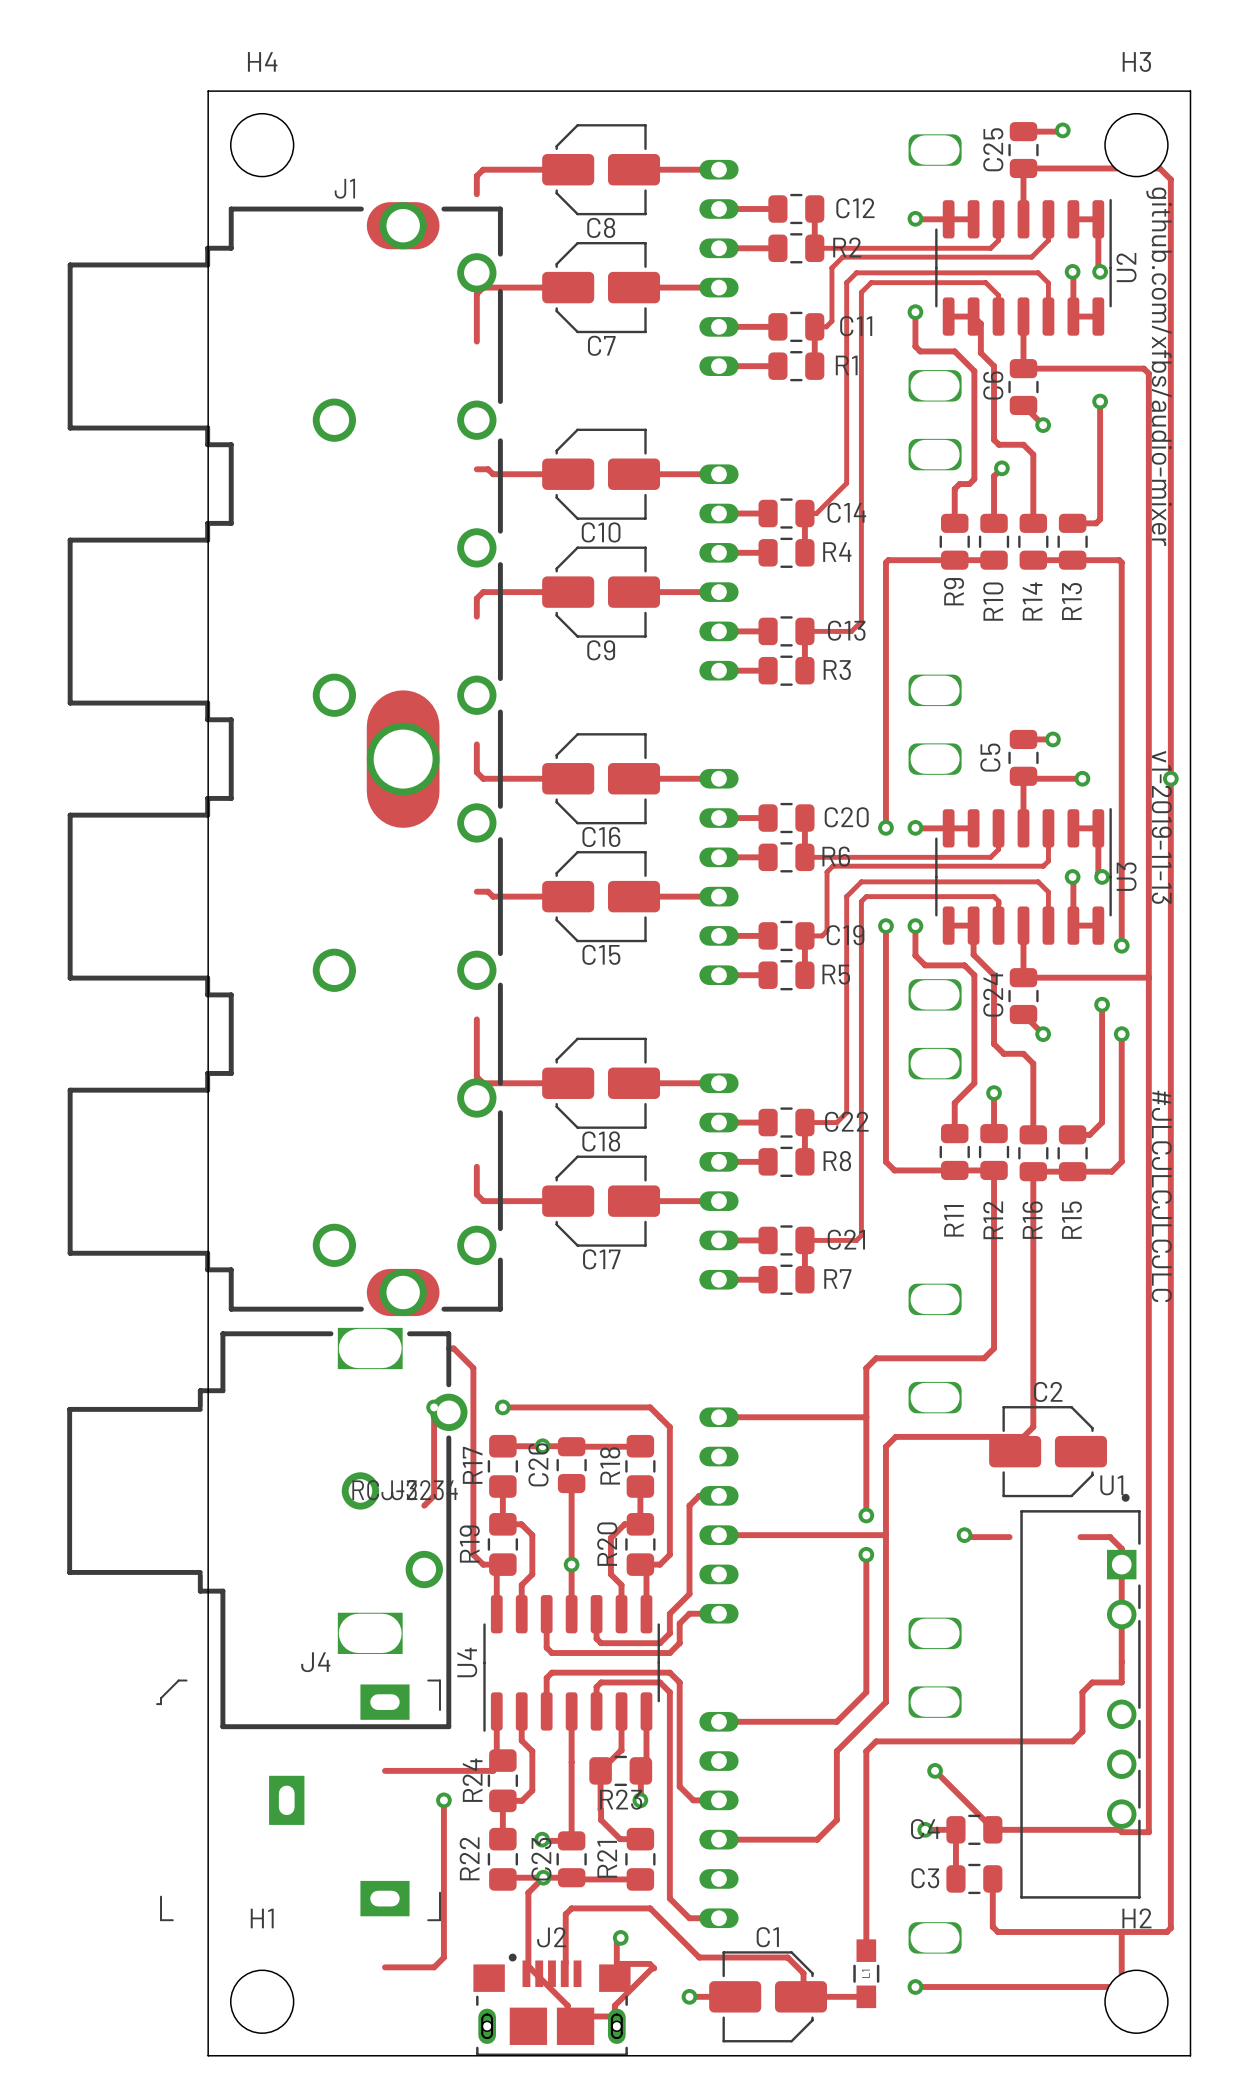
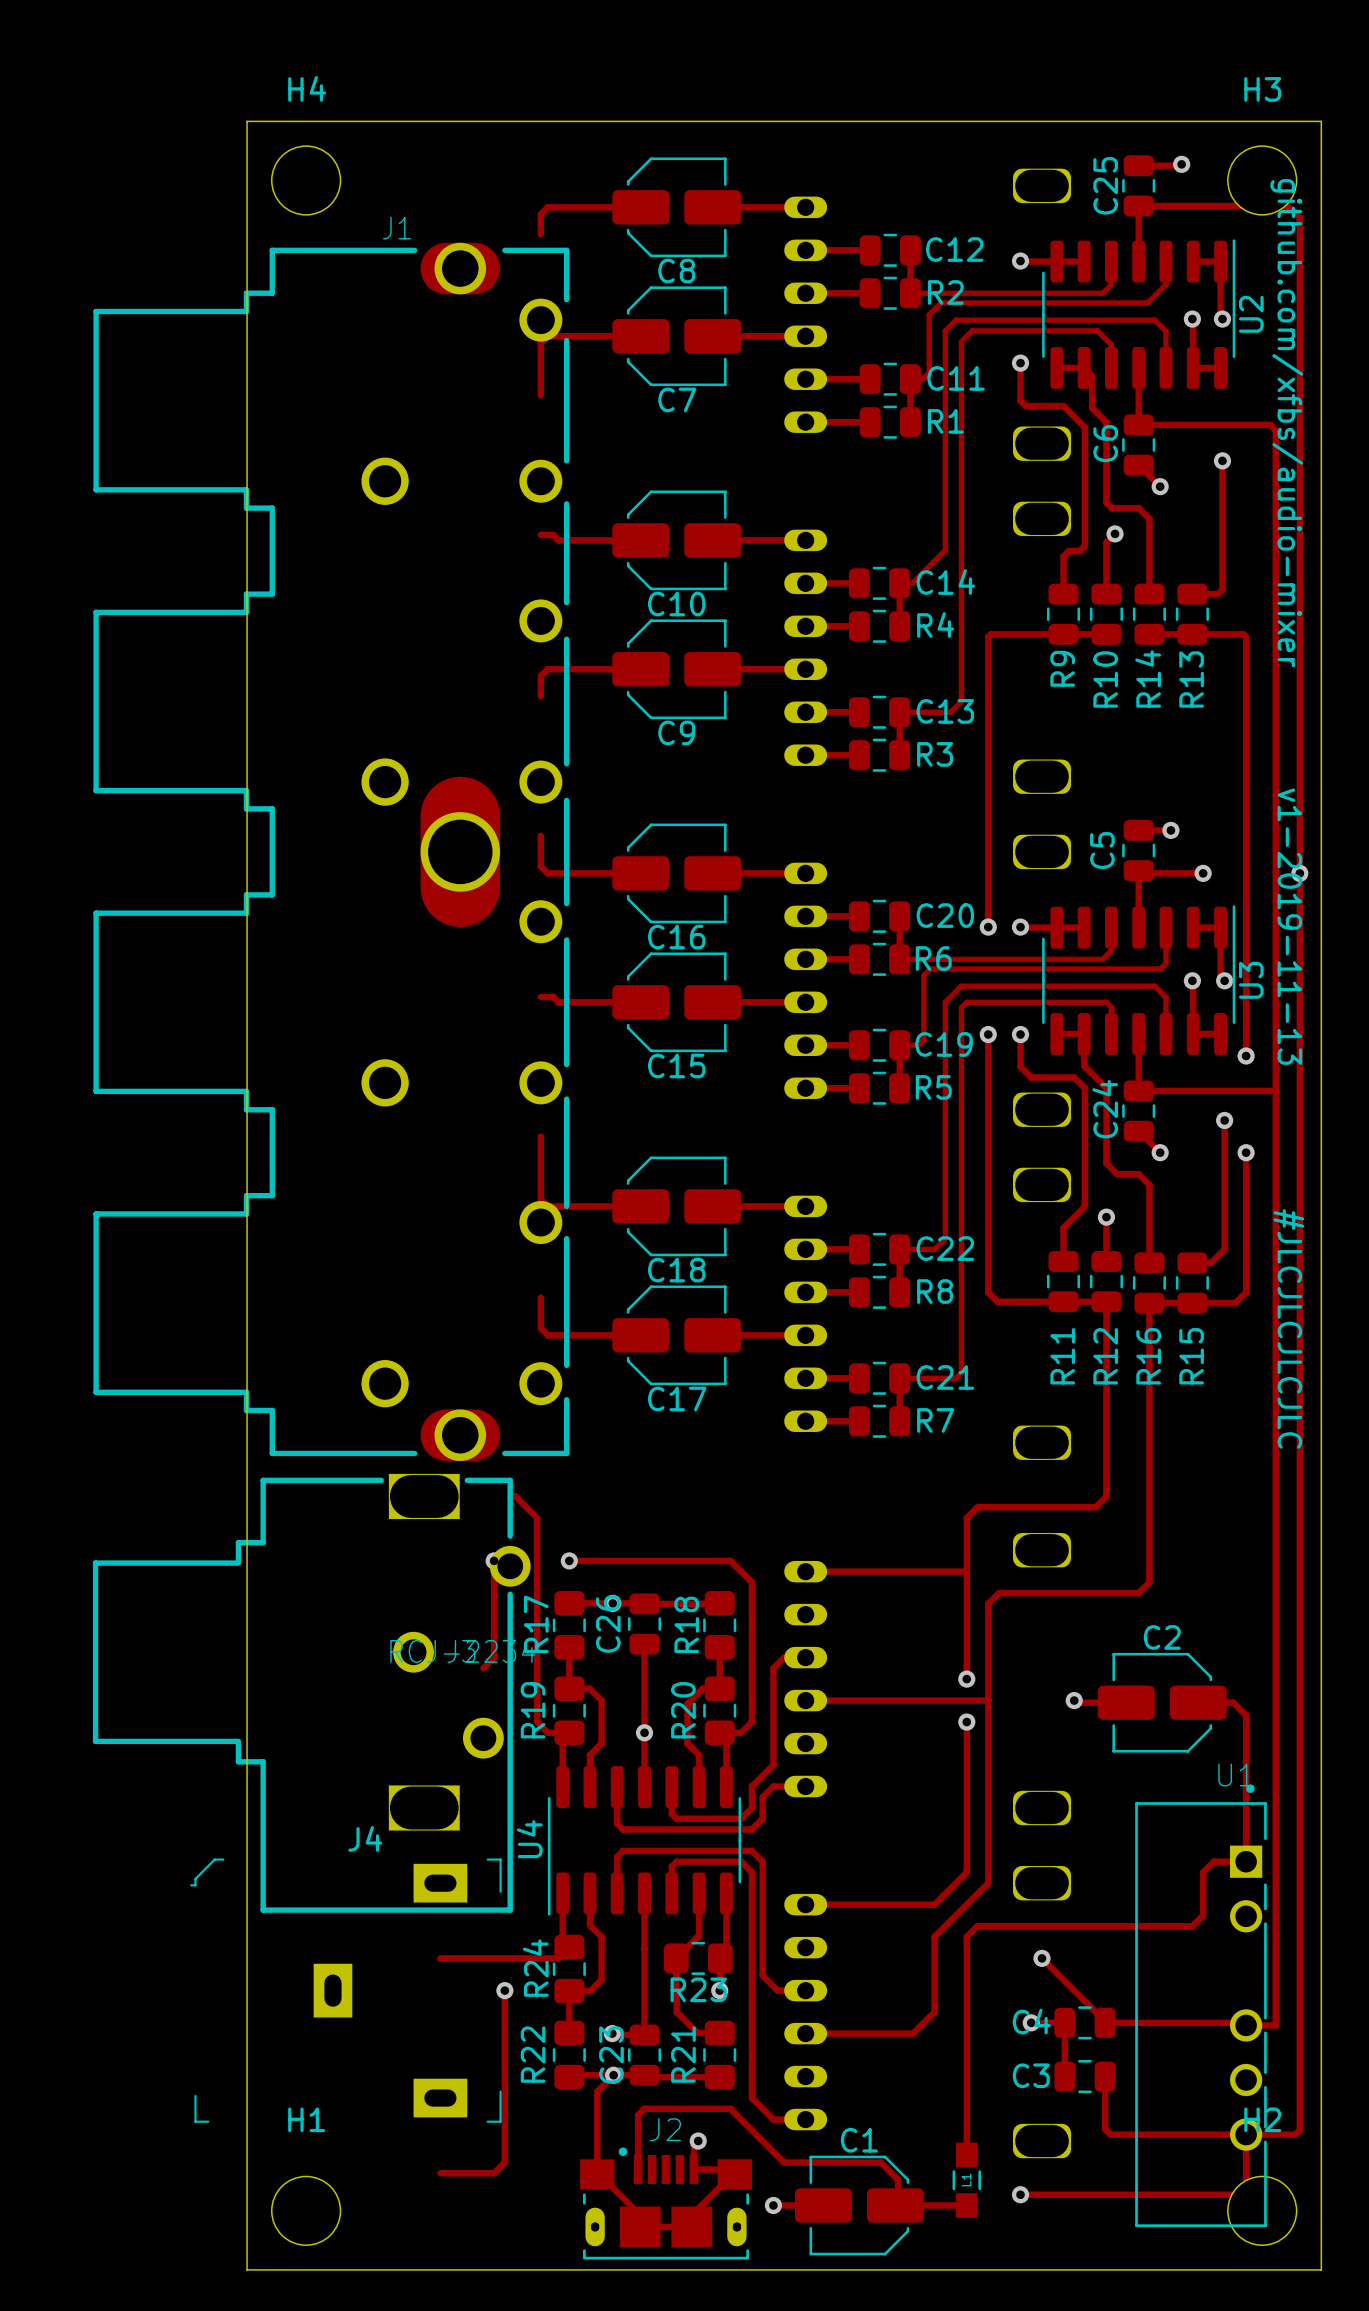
C2 position: (1048, 1451) -> (1162, 1702)
U1 position: (1080, 1696) -> (1201, 2005)
J2 position: (551, 2004) -> (666, 2203)

